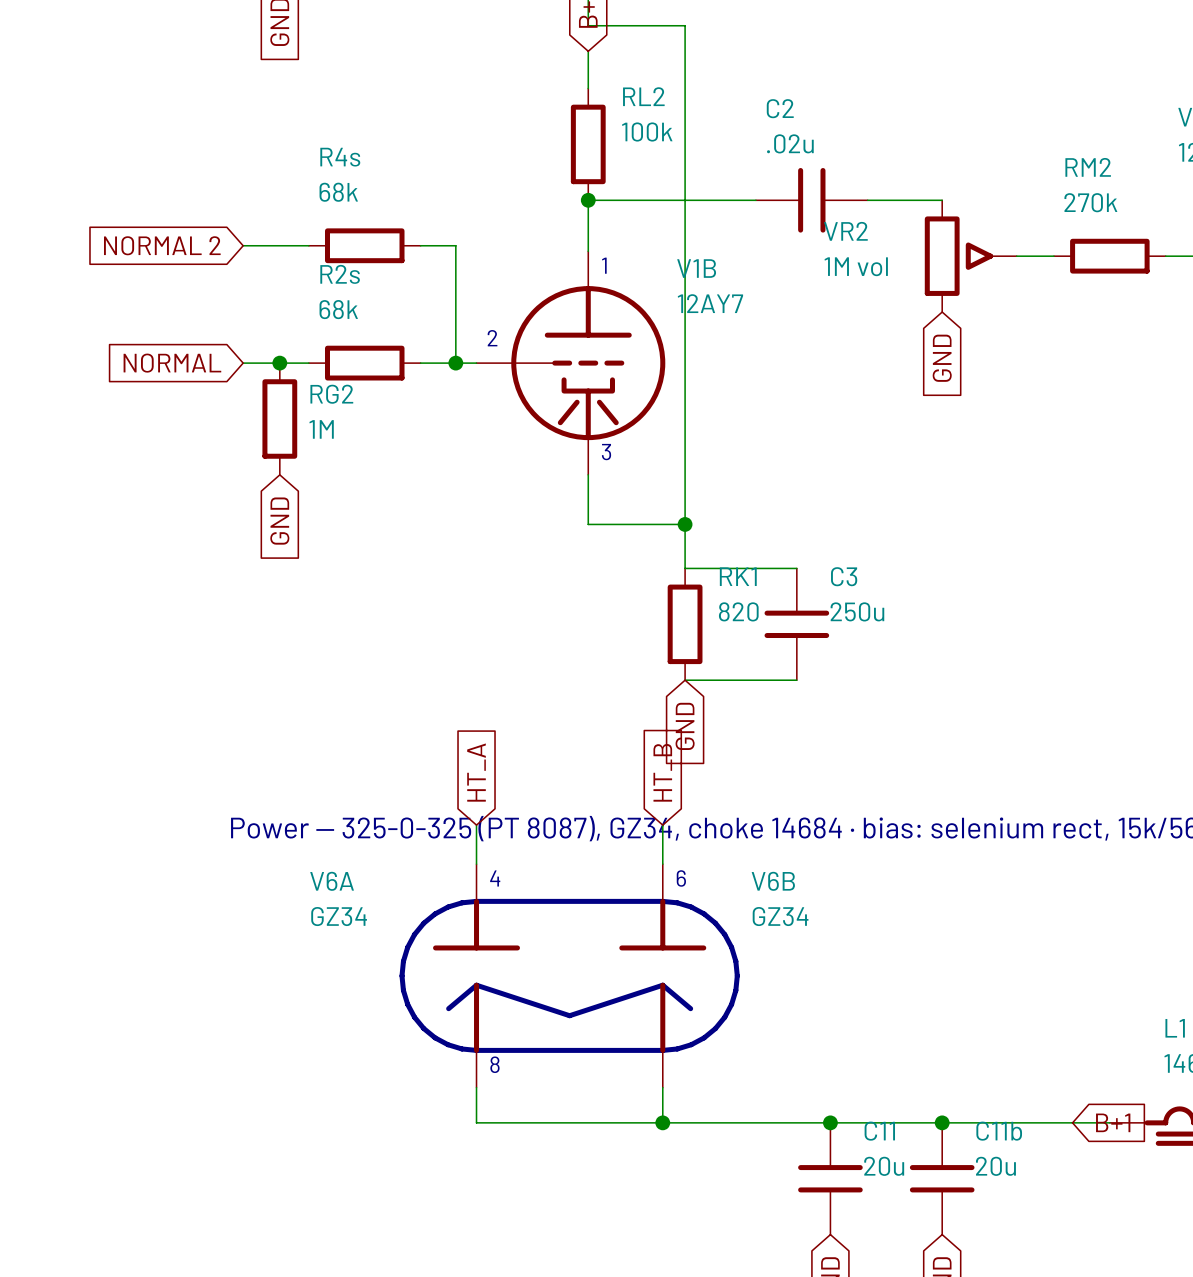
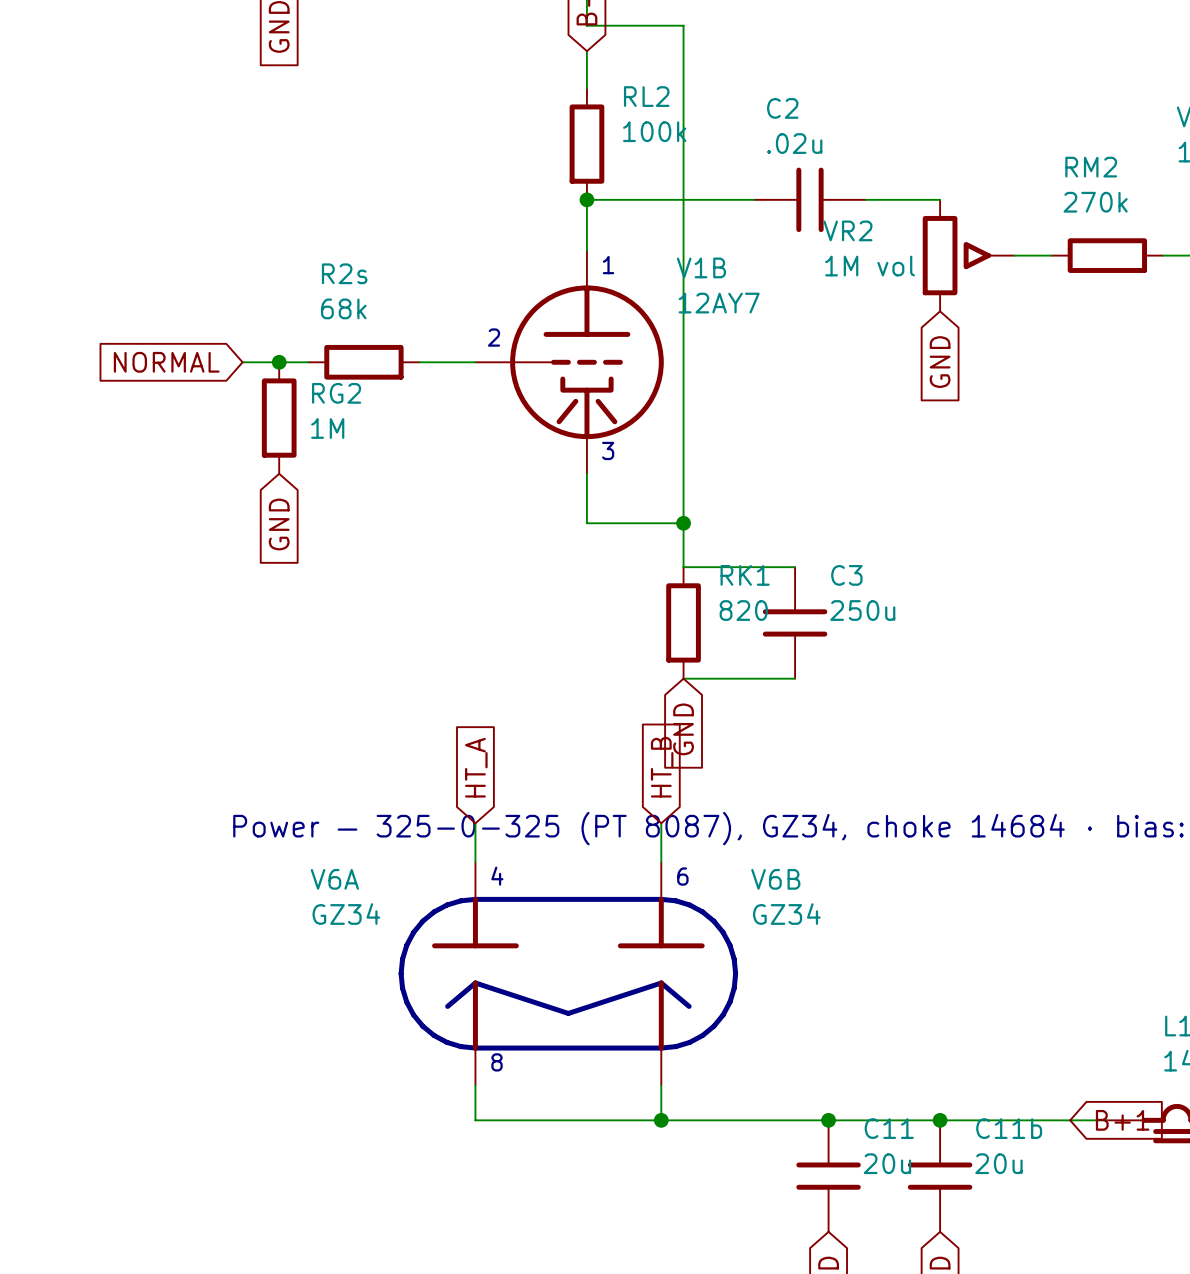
global label: NORMAL 2 (162, 245) -> none
wire: (243, 245) (308, 245) -> none
R4s: 68k (364, 245) -> none
wire: (420, 245) (455, 245) (455, 363) -> none
junction: (455, 363) -> none

